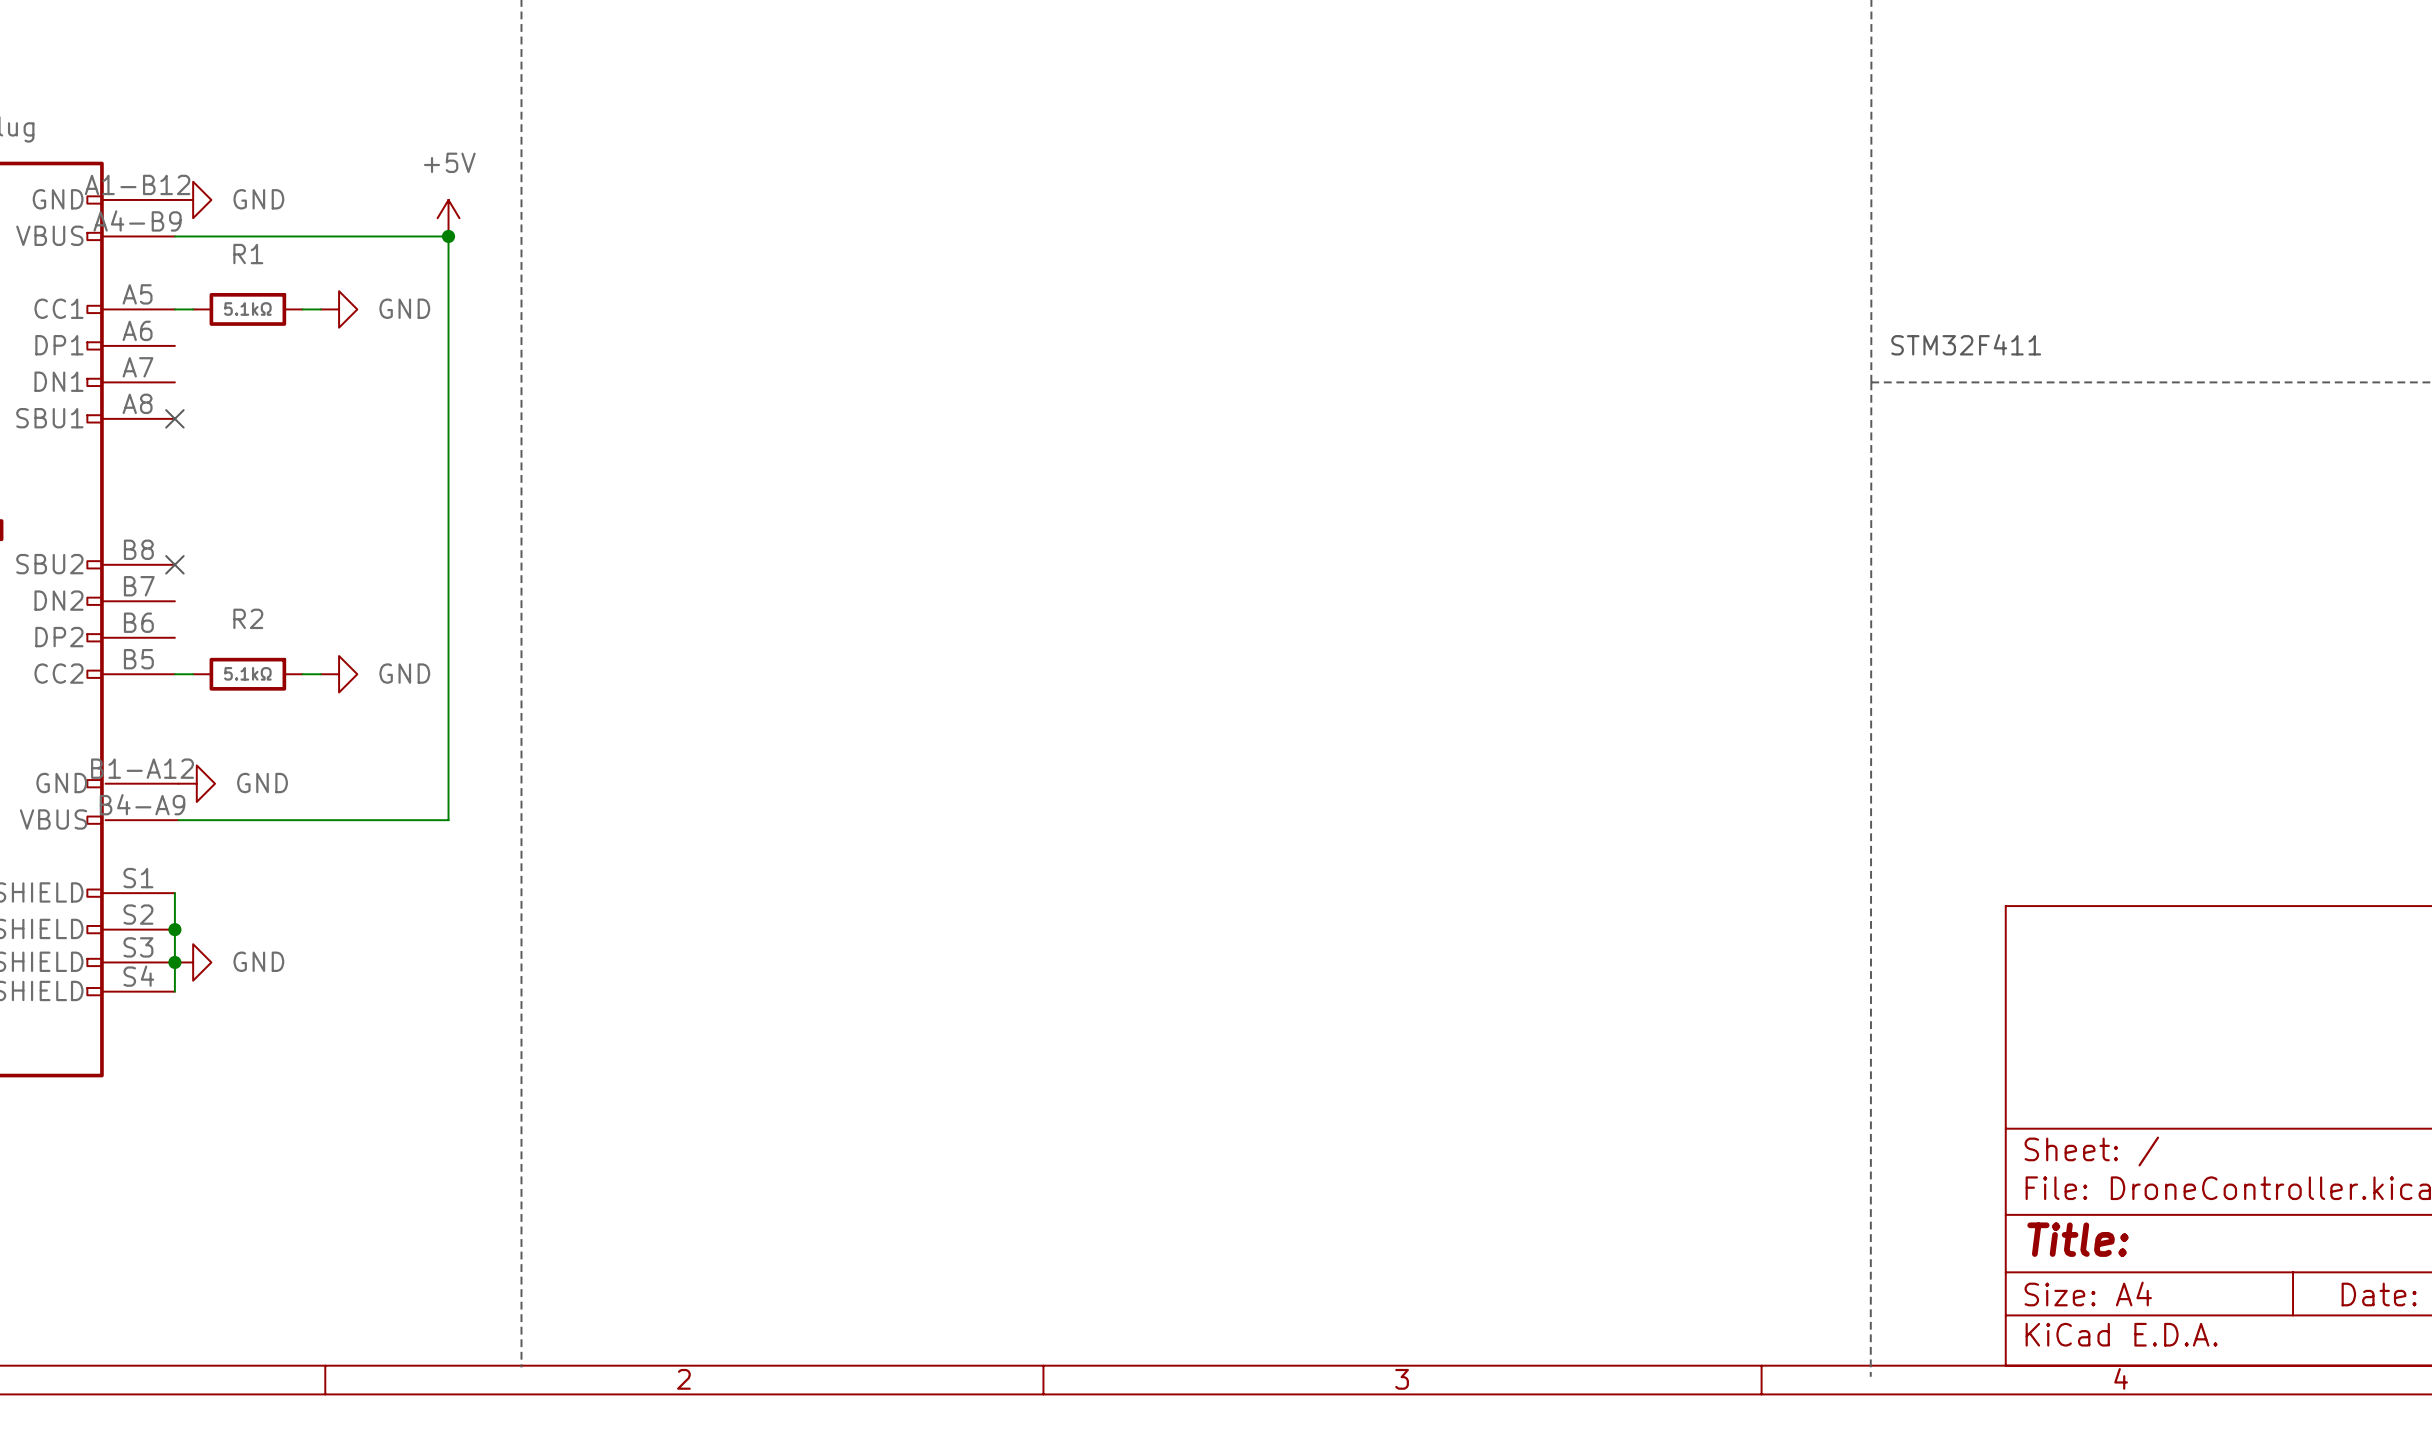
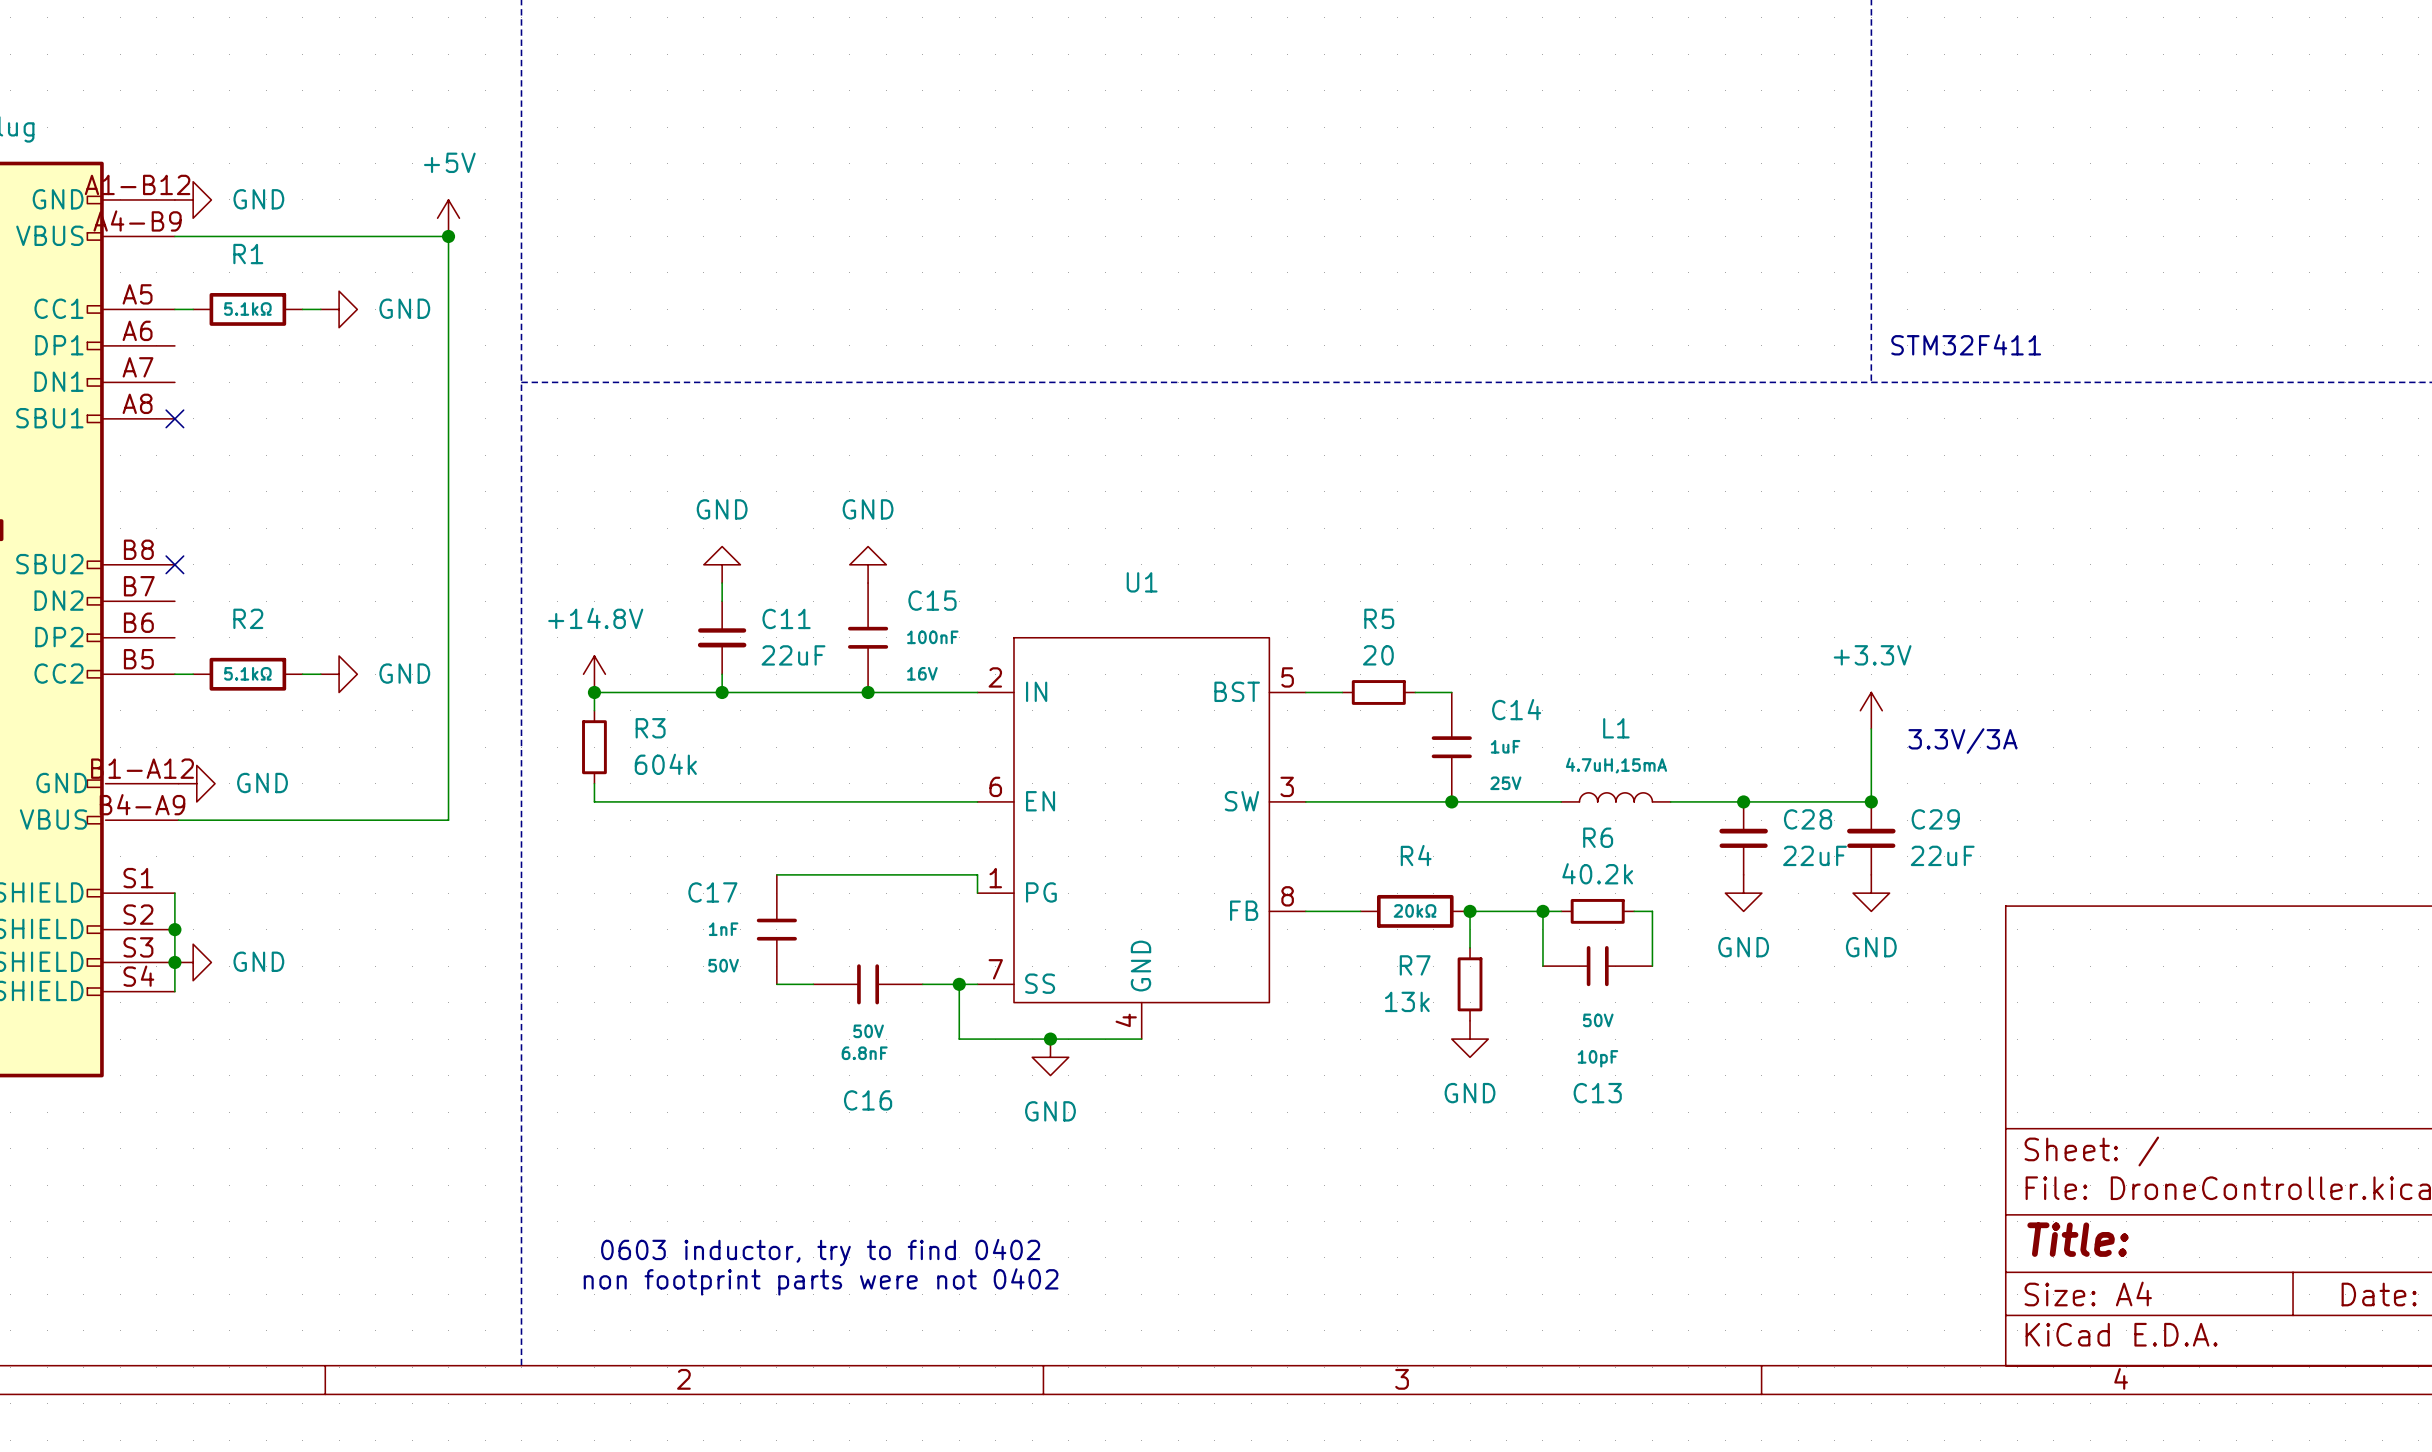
line: (1871, 382) (1870, 1376) -> (1871, 382) (521, 382)
power symbol: none -> GND (722, 564)
power symbol: none -> GND (868, 564)
wire: none -> (722, 583) (722, 601)
C11: none -> 22uF (722, 637)
C15: none -> 100nF (868, 637)
power symbol: none -> +14.8V (594, 674)
wire: none -> (722, 674) (722, 692)
junction: none -> (594, 692)
junction: none -> (722, 692)
junction: none -> (868, 692)
wire: none -> (977, 692) (594, 692) (594, 710)
wire: none -> (1305, 692) (1342, 692)
R5: none -> 20 (1378, 692)
wire: none -> (1415, 692) (1451, 692)
power symbol: none -> +3.3V (1871, 710)
wire: none -> (1871, 728) (1871, 801) (1670, 801)
text: none -> 3.3V/3A (1962, 741)
R3: none -> 604k (594, 747)
C14: none -> 1uF (1451, 747)
wire: none -> (594, 783) (594, 801) (977, 801)
L1: none -> 4.7uH,15mA (1615, 797)
wire: none -> (1305, 801) (1561, 801)
junction: none -> (1451, 801)
junction: none -> (1743, 801)
junction: none -> (1871, 801)
U1: none -> (1141, 838)
C28: none -> 22uF (1743, 838)
C29: none -> 22uF (1871, 838)
wire: none -> (776, 874) (977, 874) (977, 893)
power symbol: none -> GND (1743, 893)
power symbol: none -> GND (1871, 893)
wire: none -> (1305, 911) (1360, 911)
R4: none -> 20kΩ (1415, 911)
junction: none -> (1470, 911)
wire: none -> (1542, 911) (1542, 966)
junction: none -> (1542, 911)
wire: none -> (1561, 911) (1470, 911) (1470, 947)
R6: none -> 40.2k (1597, 911)
wire: none -> (1634, 911) (1652, 911) (1652, 966)
C17: none -> 1nF (776, 929)
C13: none -> 10pF (1597, 966)
wire: none -> (776, 984) (813, 984)
C16: none -> 6.8nF (868, 984)
wire: none -> (922, 984) (977, 984)
wire: none -> (959, 984) (959, 1039) (1141, 1039)
junction: none -> (959, 984)
R7: none -> 13k (1470, 984)
junction: none -> (1050, 1039)
power symbol: none -> GND (1470, 1039)
power symbol: none -> GND (1050, 1057)
text: none -> 0603 inductor, try to find 0402 (820, 1252)
text: none -> non footprint parts were not 0402 (821, 1281)

